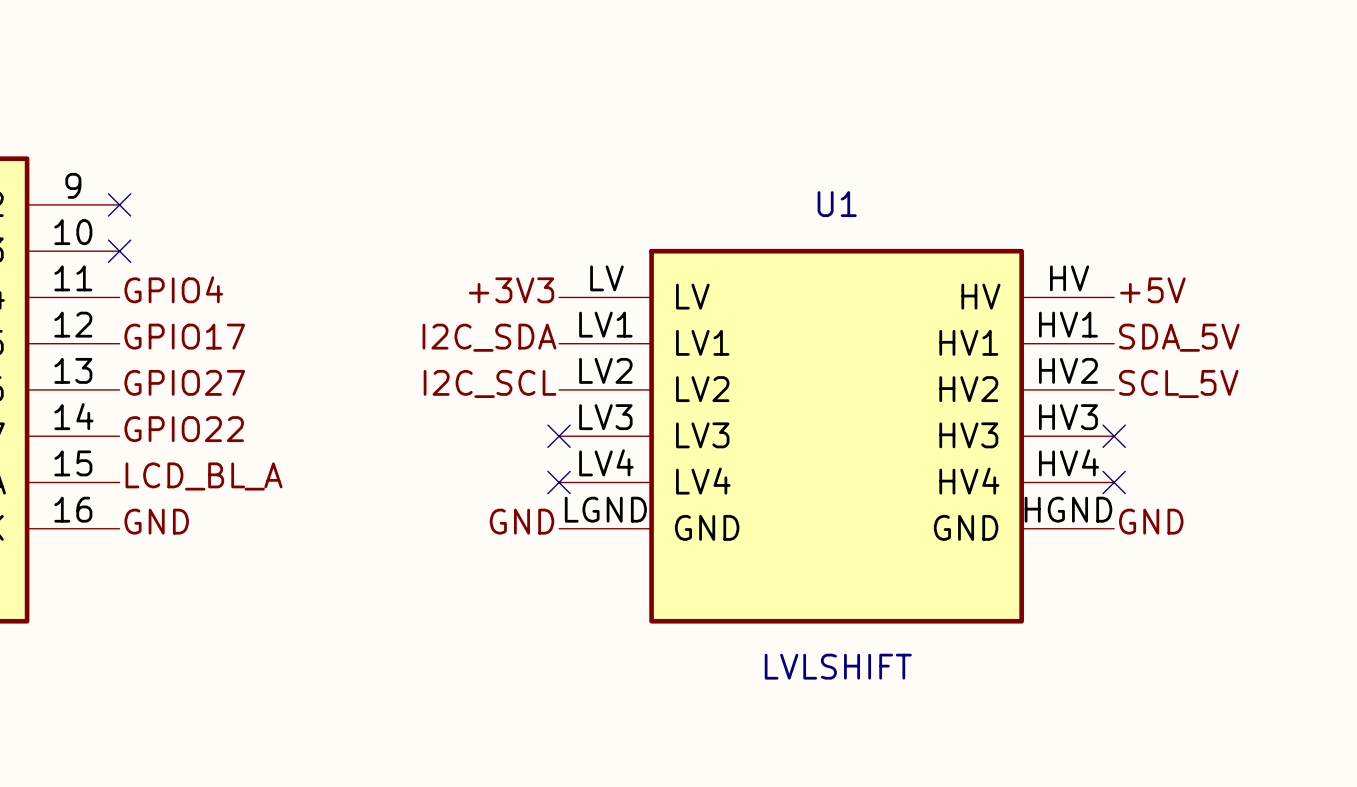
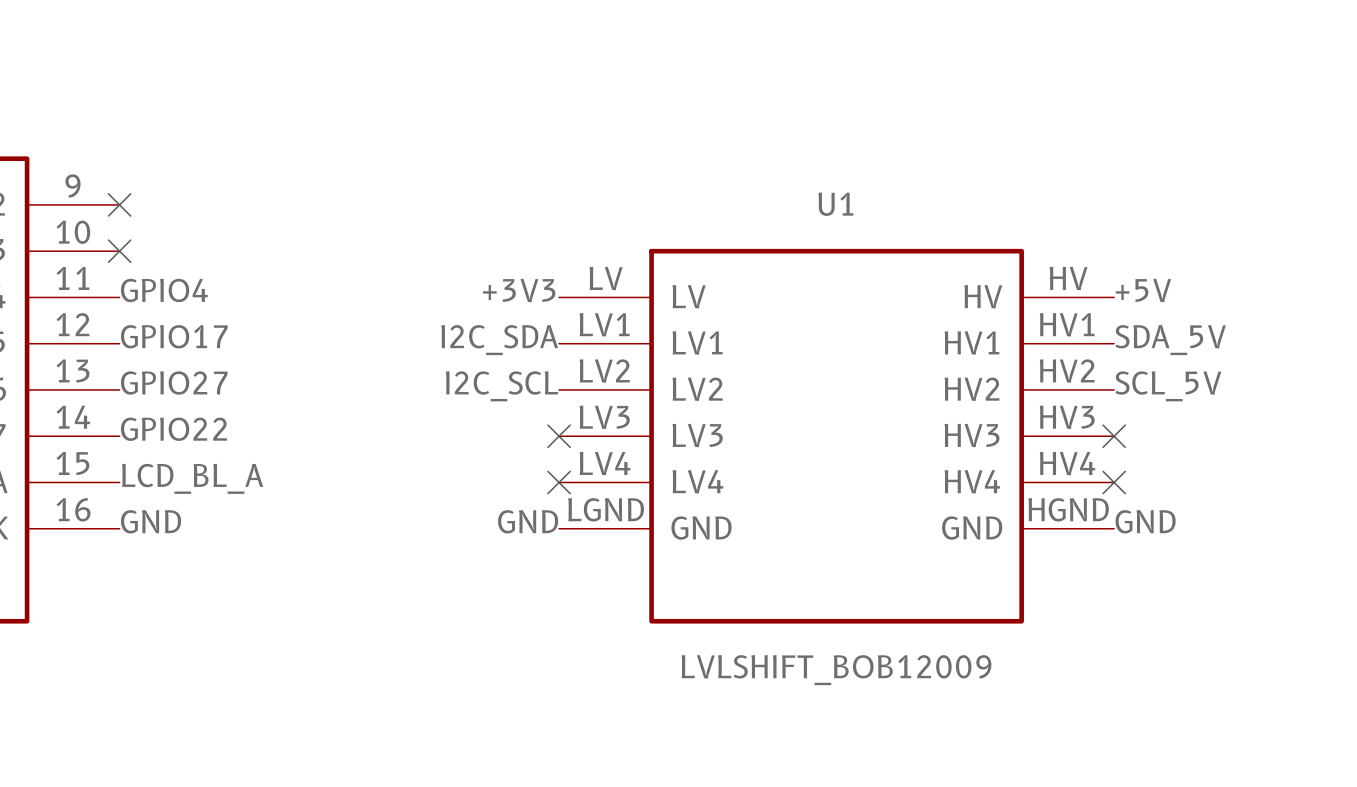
U1 value: LVLSHIFT (838, 666) -> LVLSHIFT_BOB12009 (836, 670)

